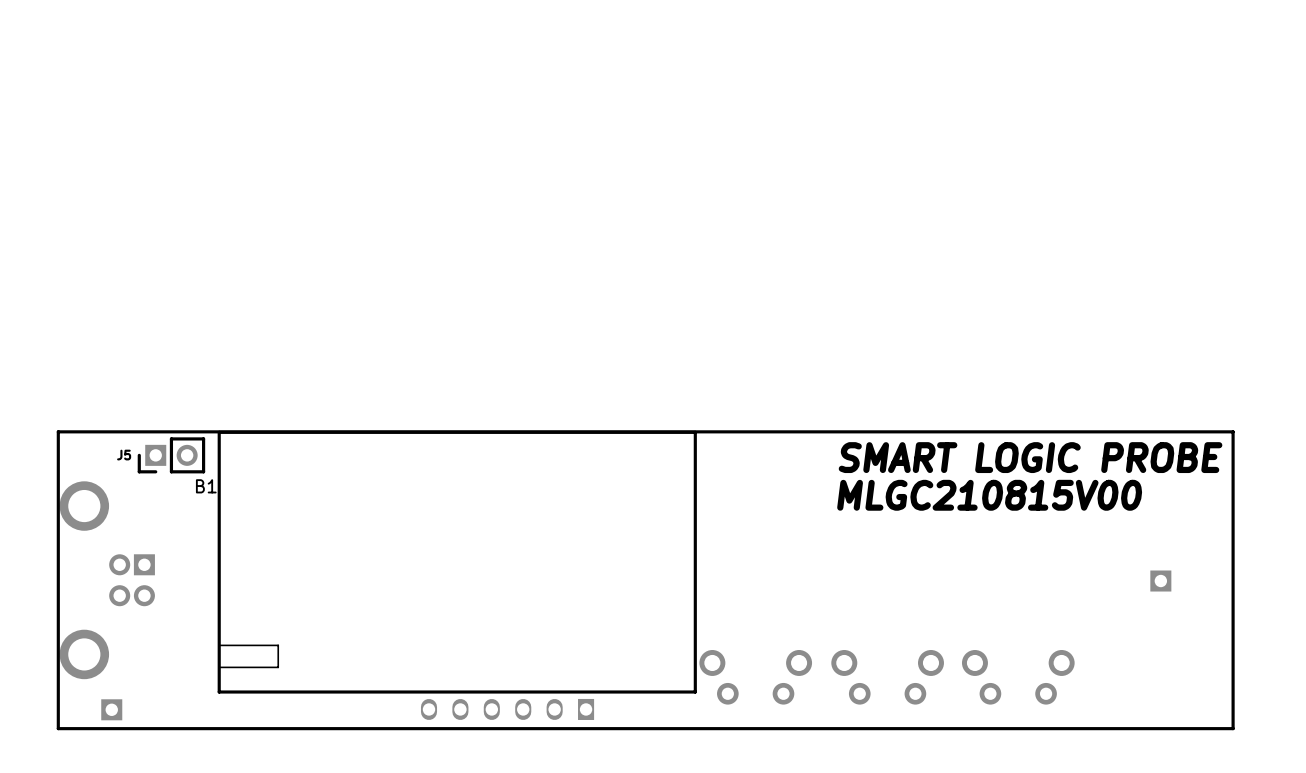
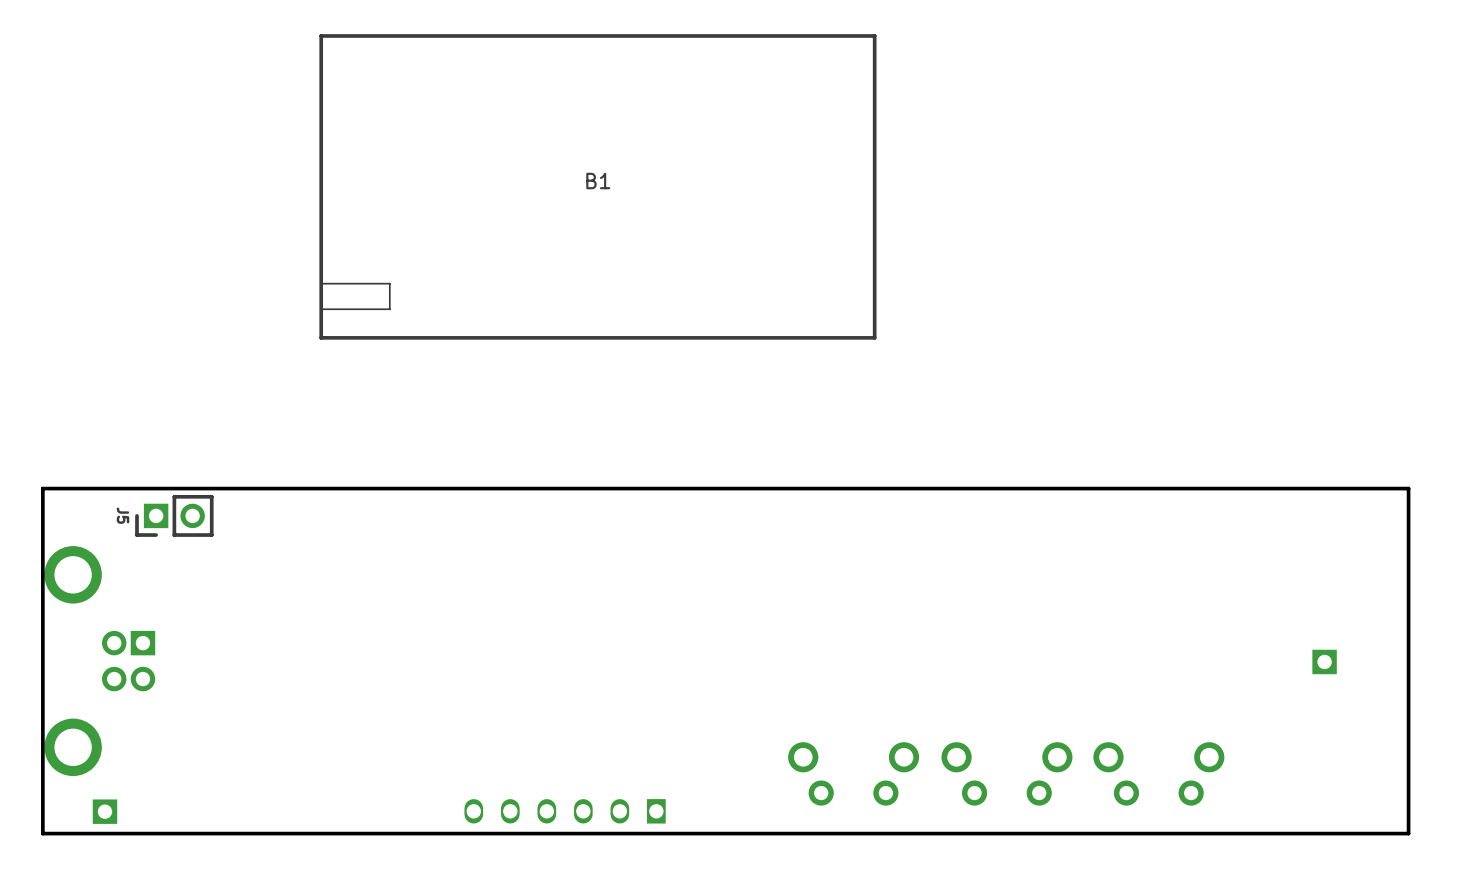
J5 name rotation: 0° (124, 455) -> 90° clockwise (122, 515)
text: SMART LOGIC PROBE (1030, 457) -> none
B1 name position: B1 (206, 486) -> B1 (598, 181)
text: MLGC210815V00 (989, 495) -> none
B1 position: (457, 562) -> (597, 186)

